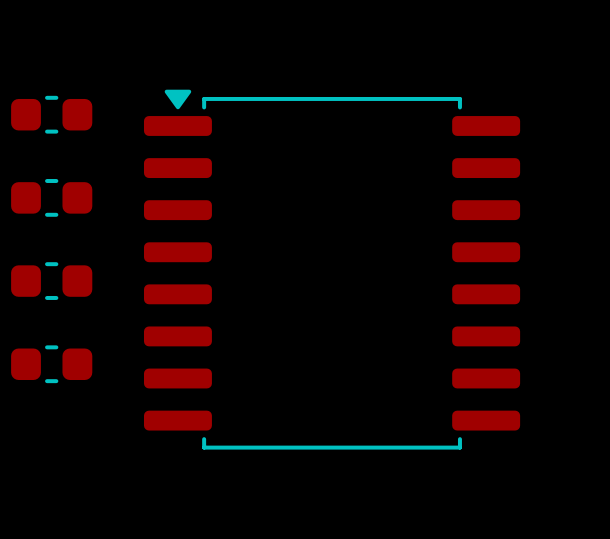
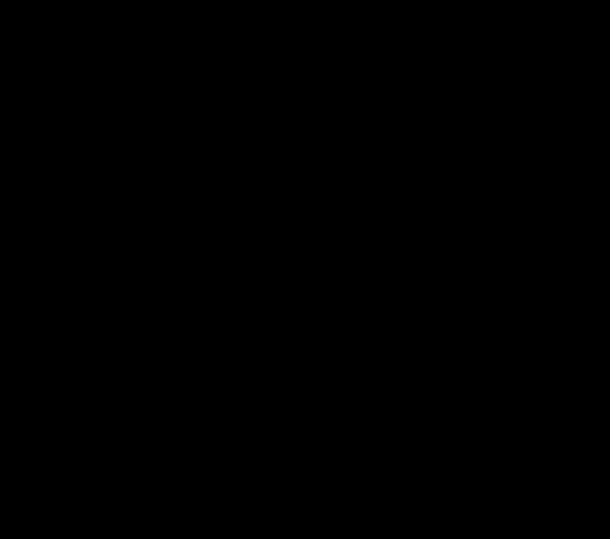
part: (51, 114) -> none
part: (51, 197) -> none
part: (332, 269) -> none
part: (51, 281) -> none
part: (51, 364) -> none

